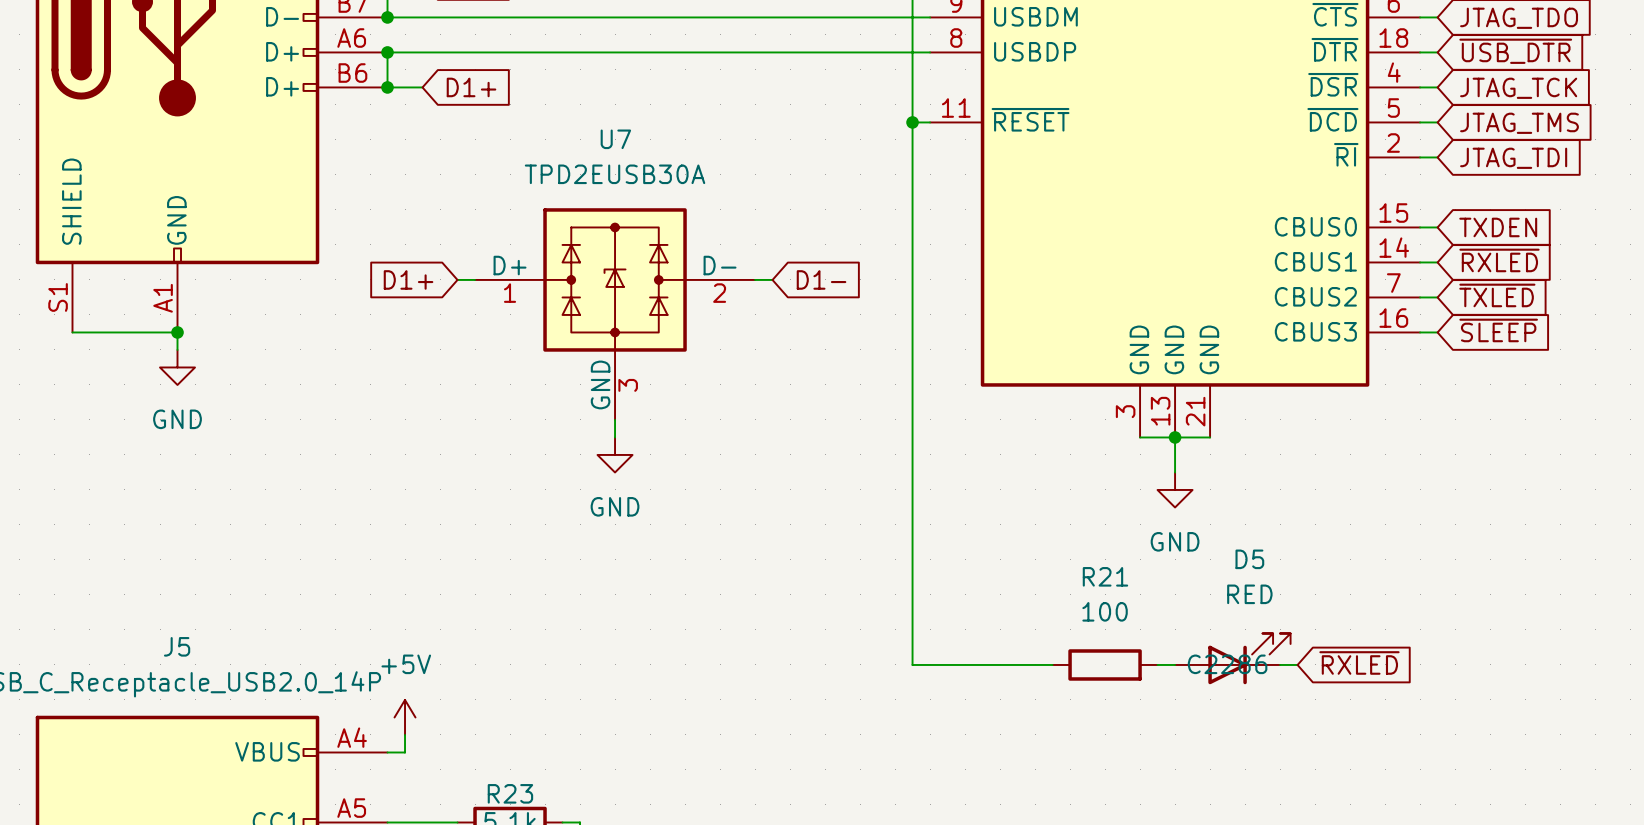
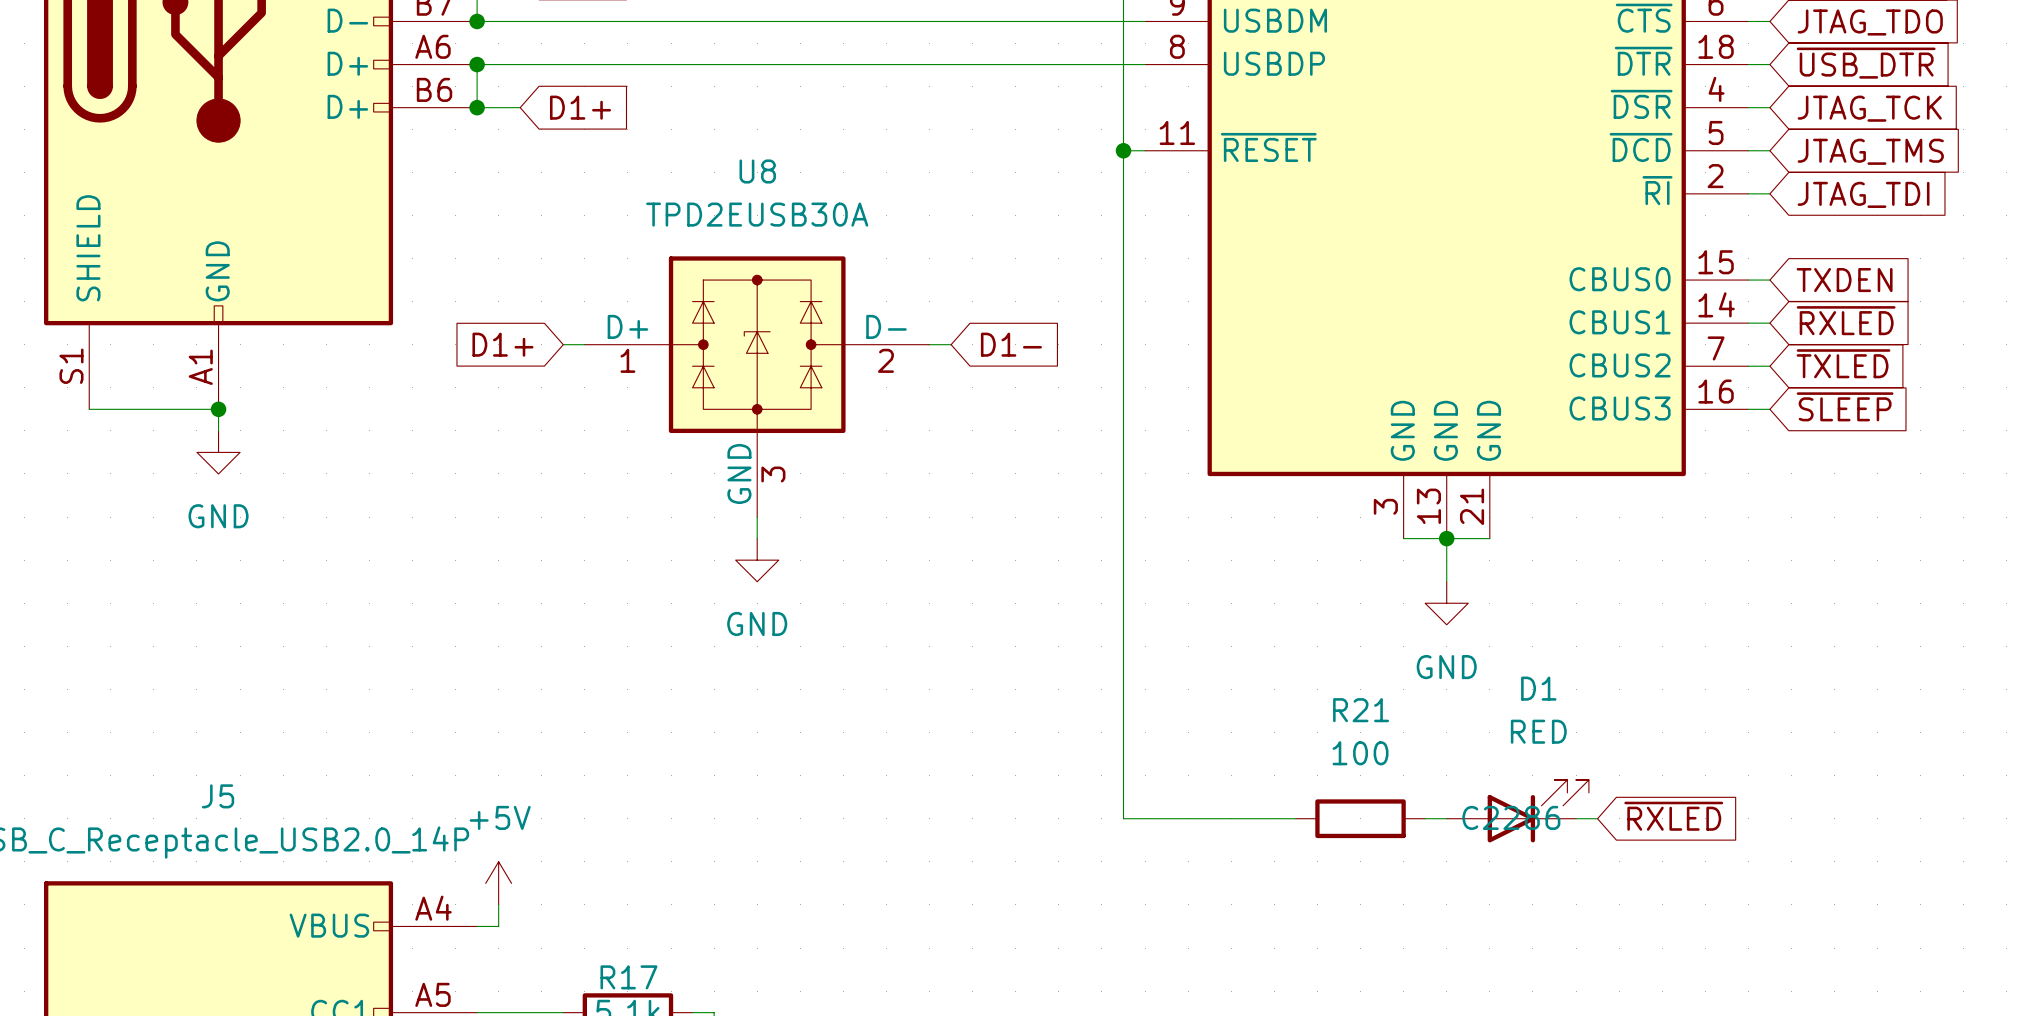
U7 name: U7 (615, 139) -> U8 (757, 171)
D5 name: D5 (1249, 559) -> D1 (1538, 688)
R23 name: R23 (510, 793) -> R17 (628, 977)

